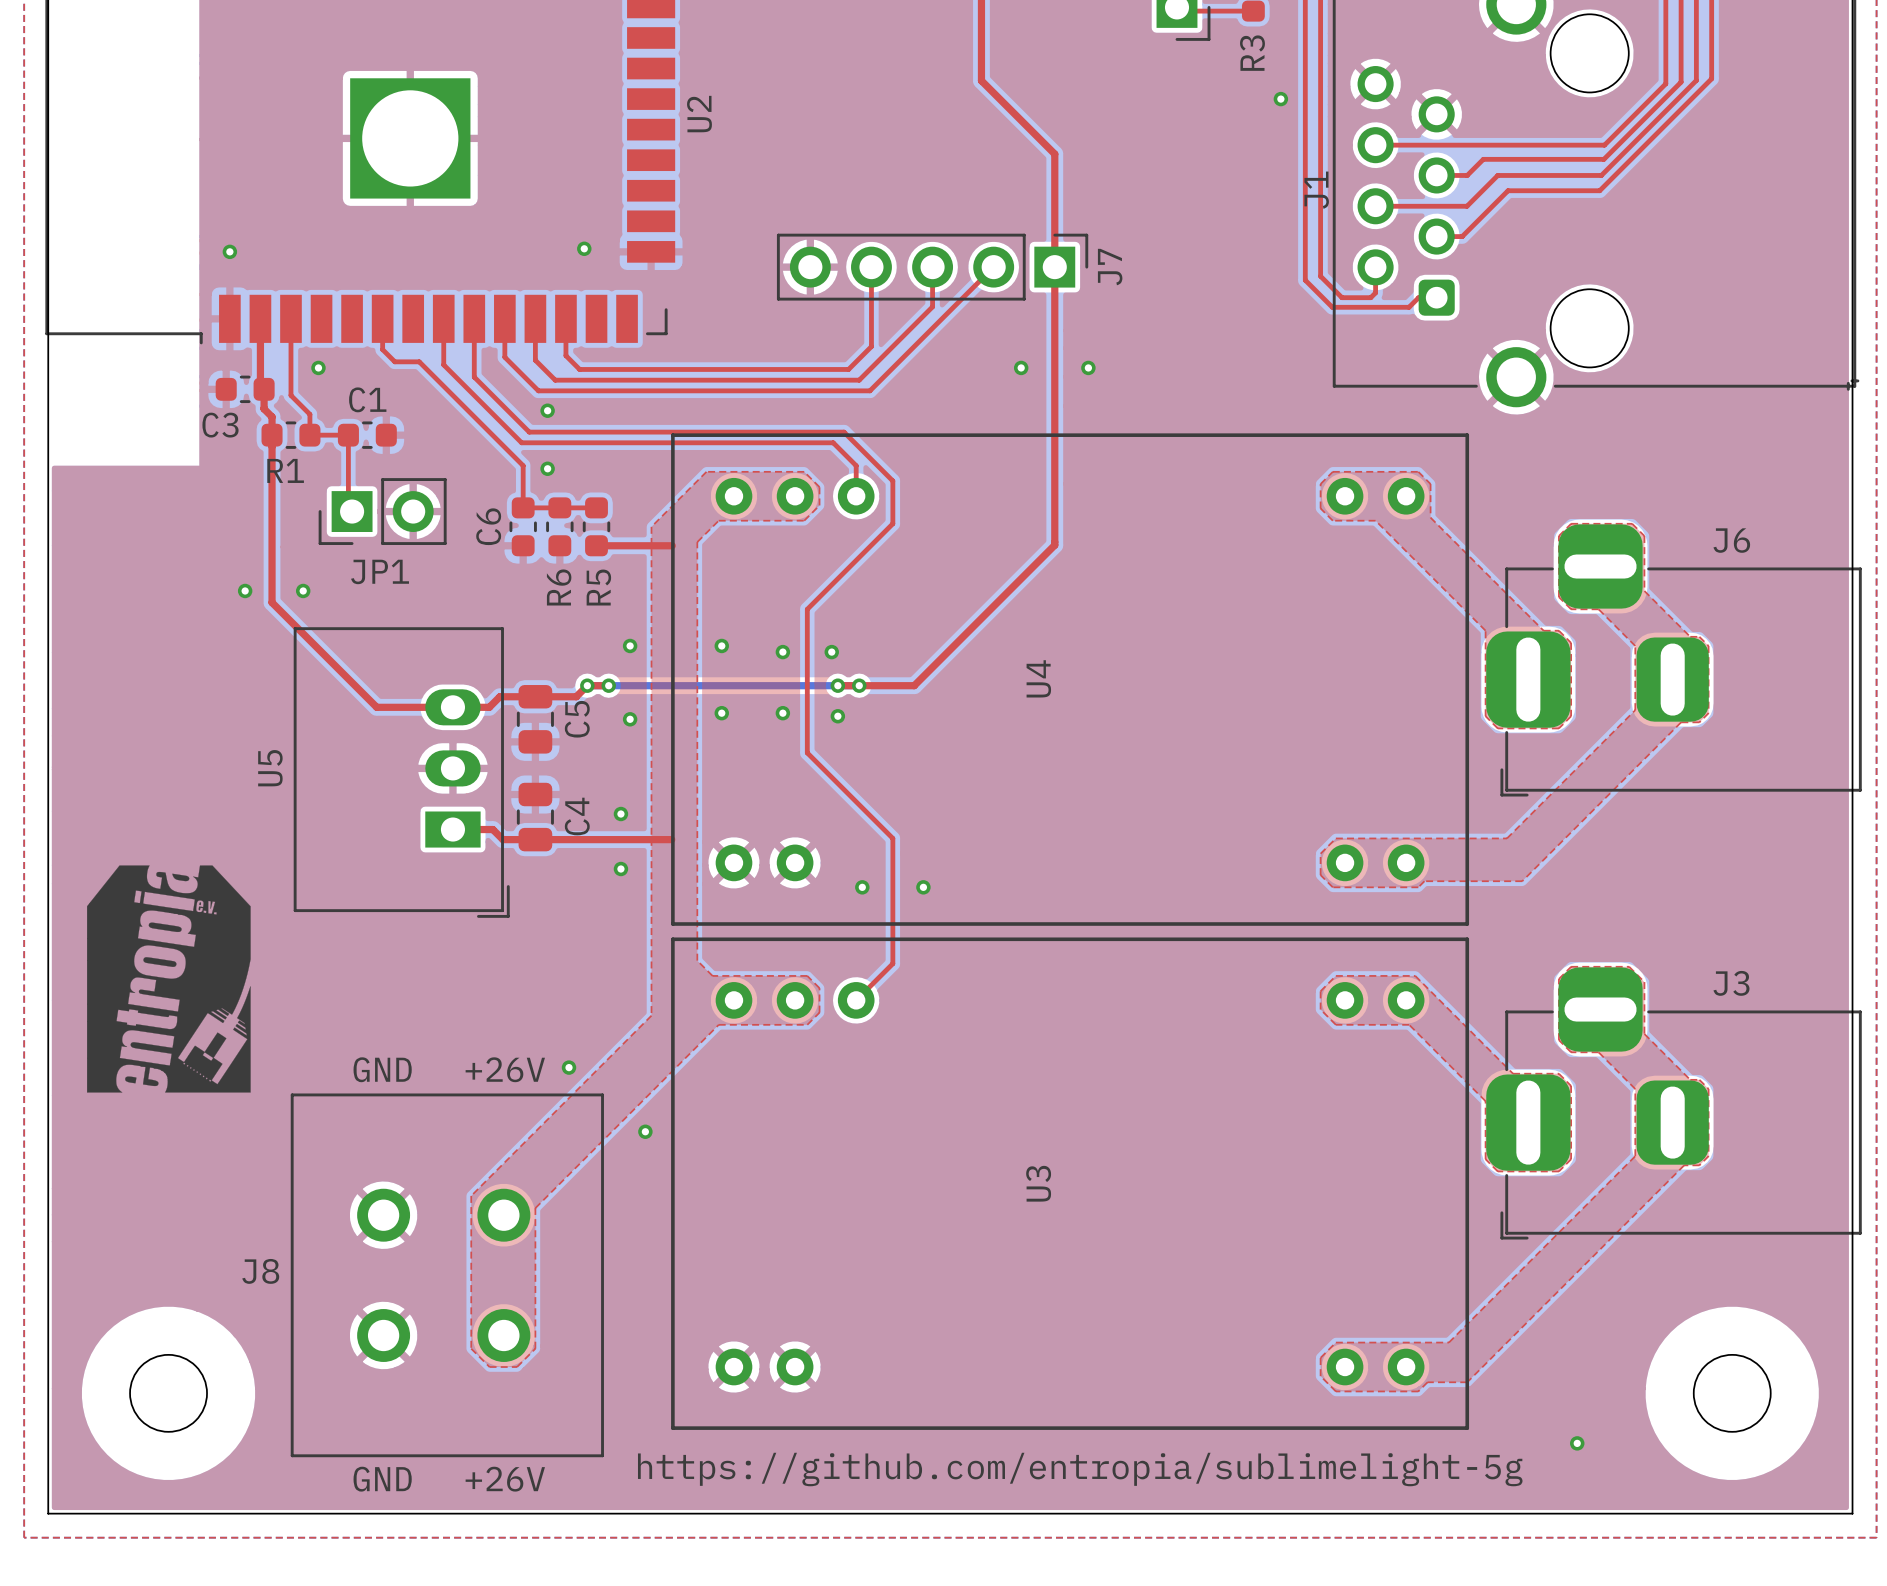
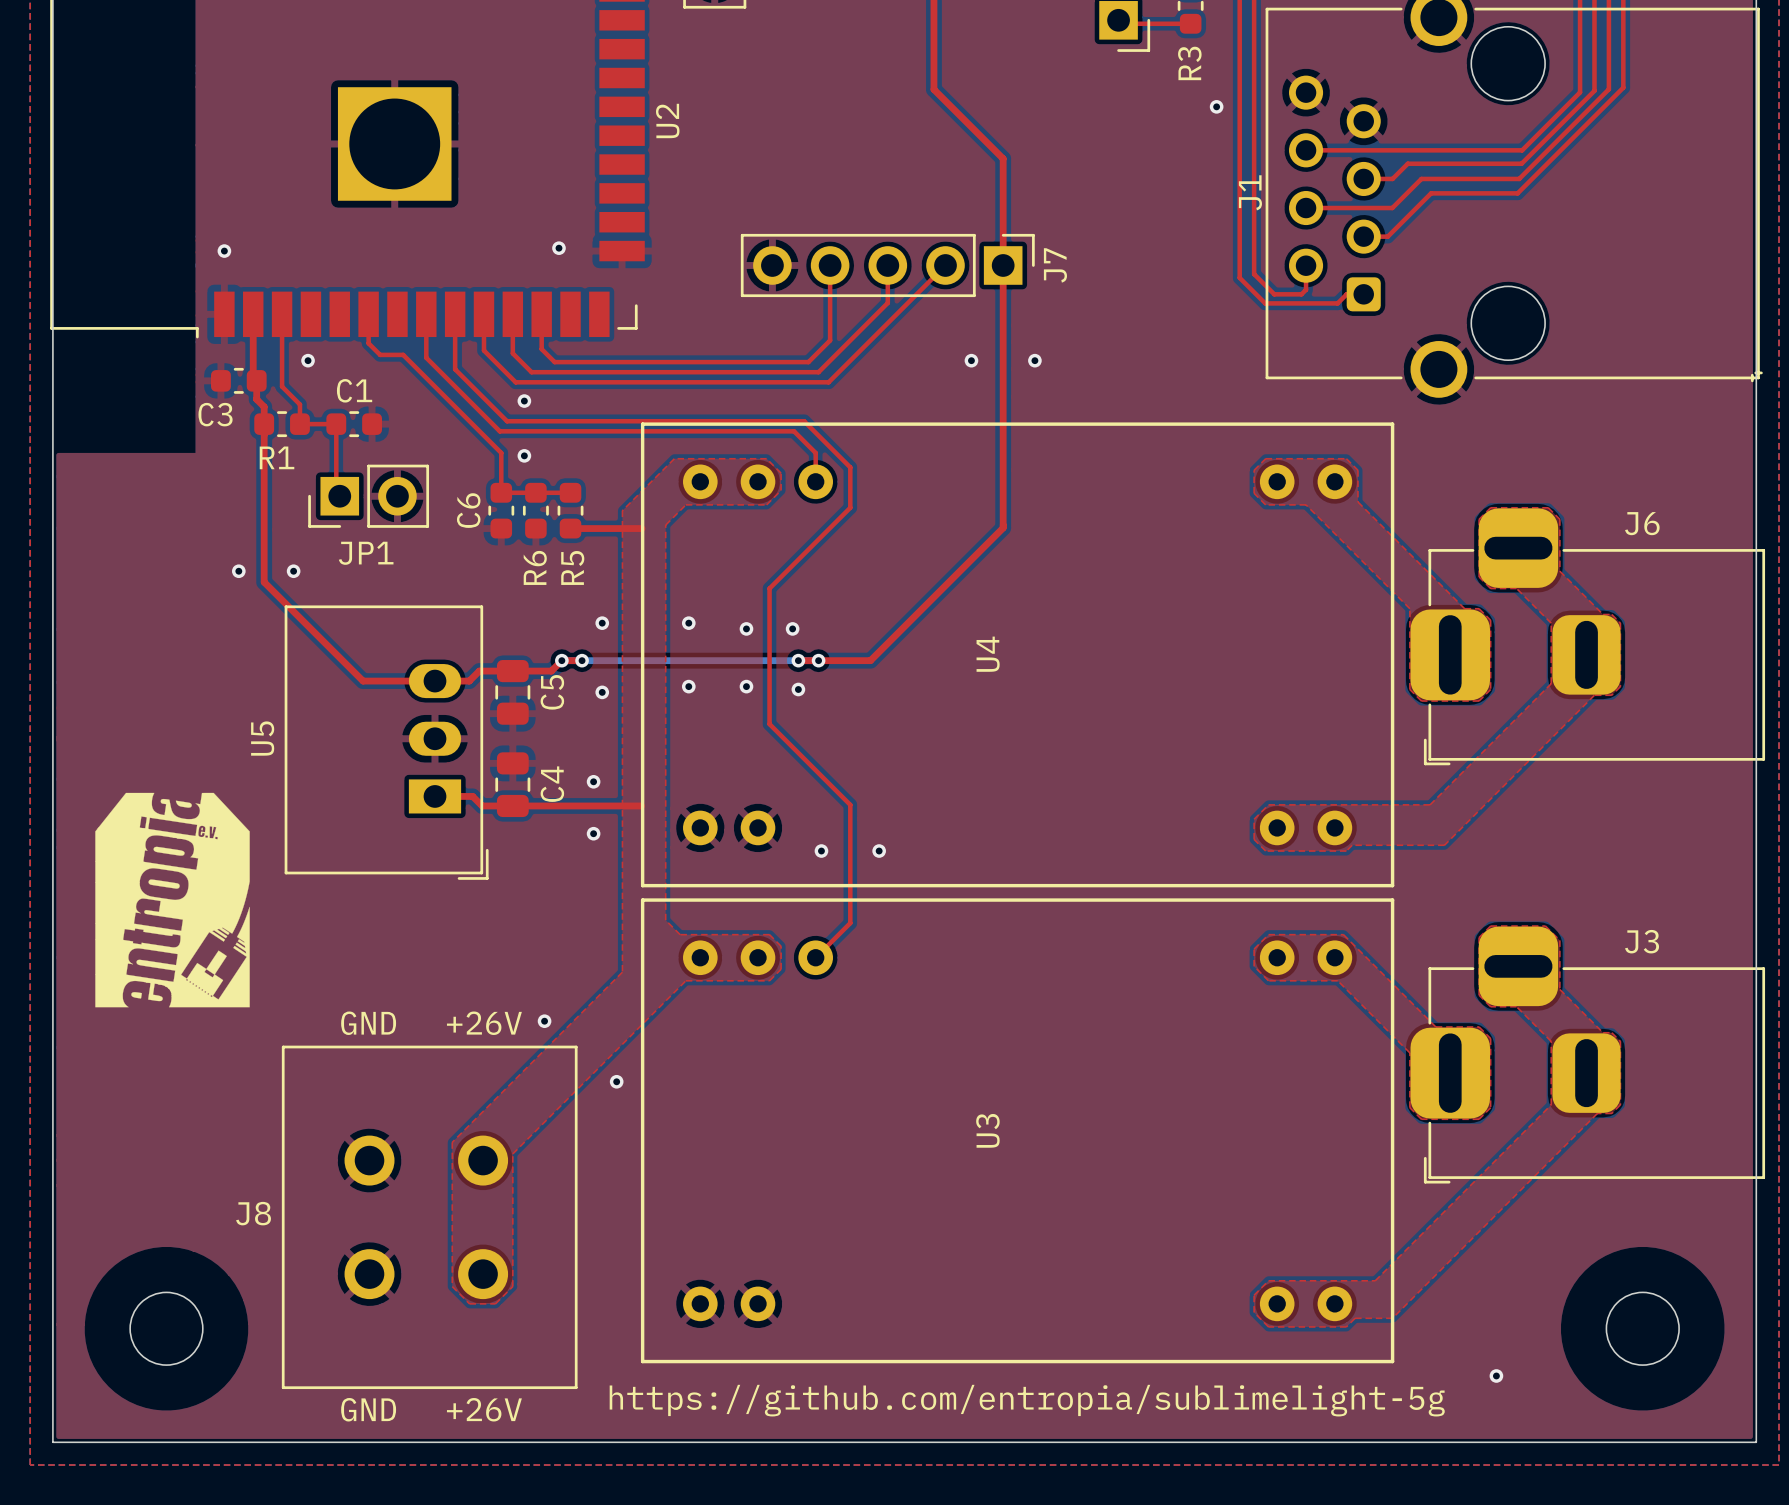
drawing position: (168, 978) -> (172, 900)

